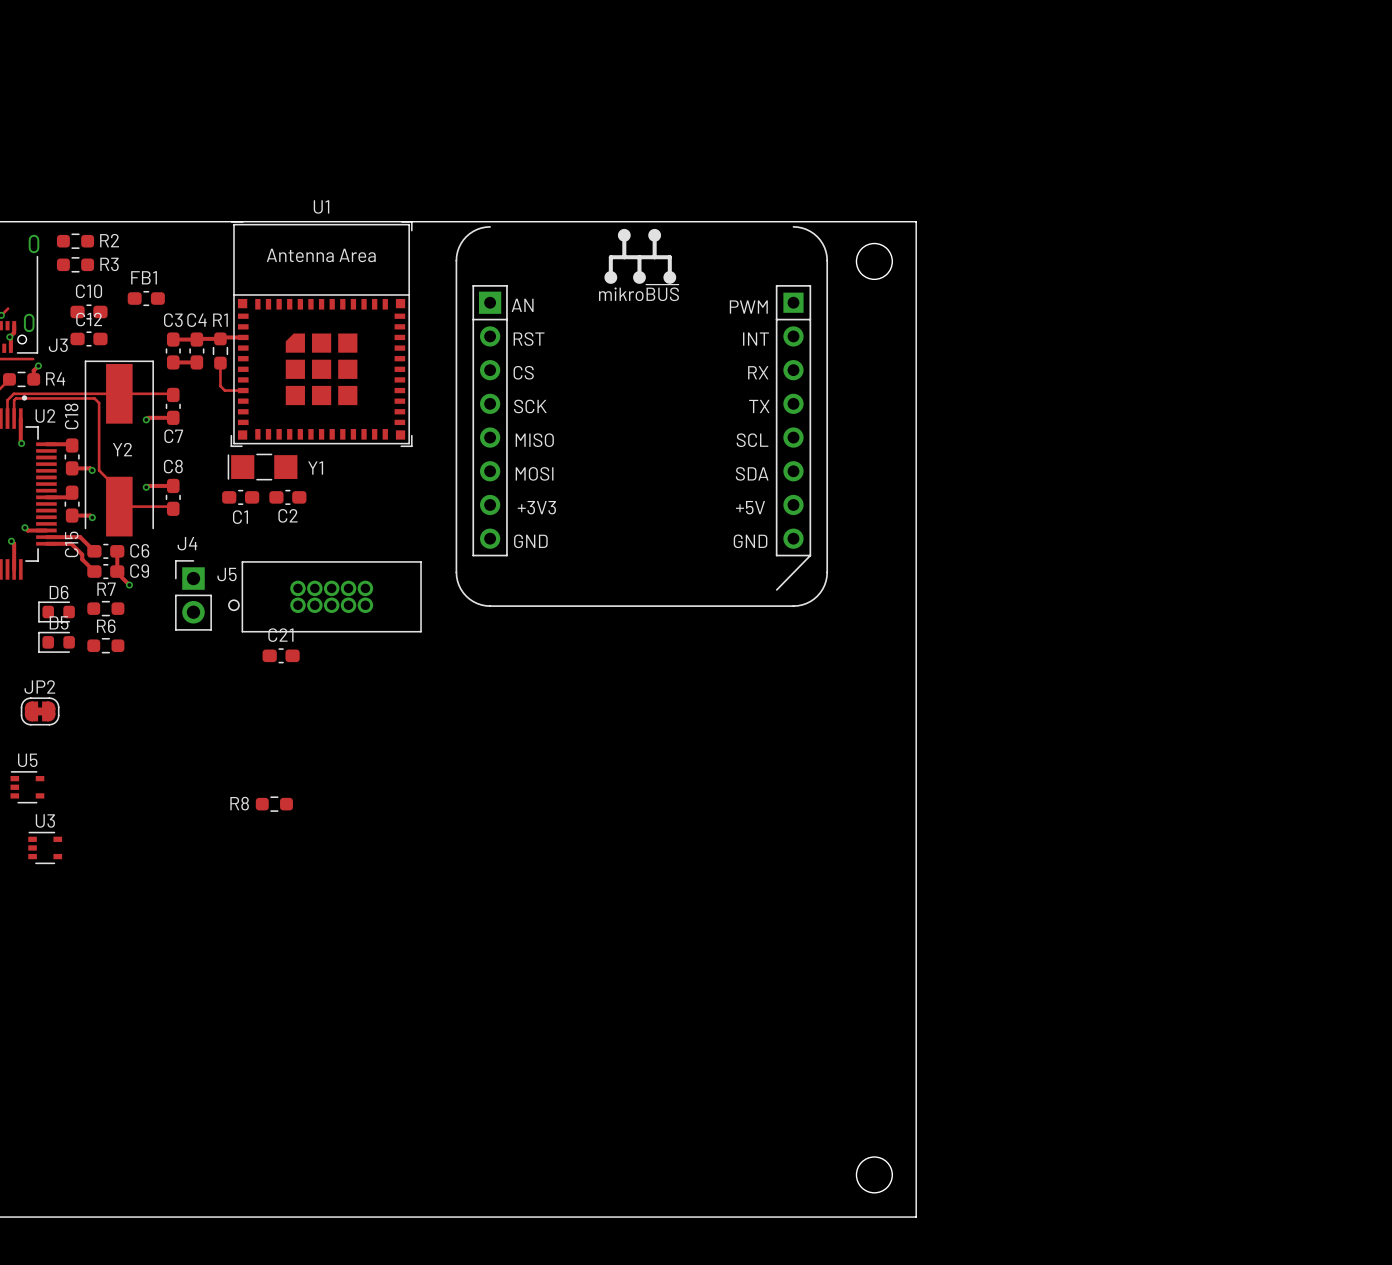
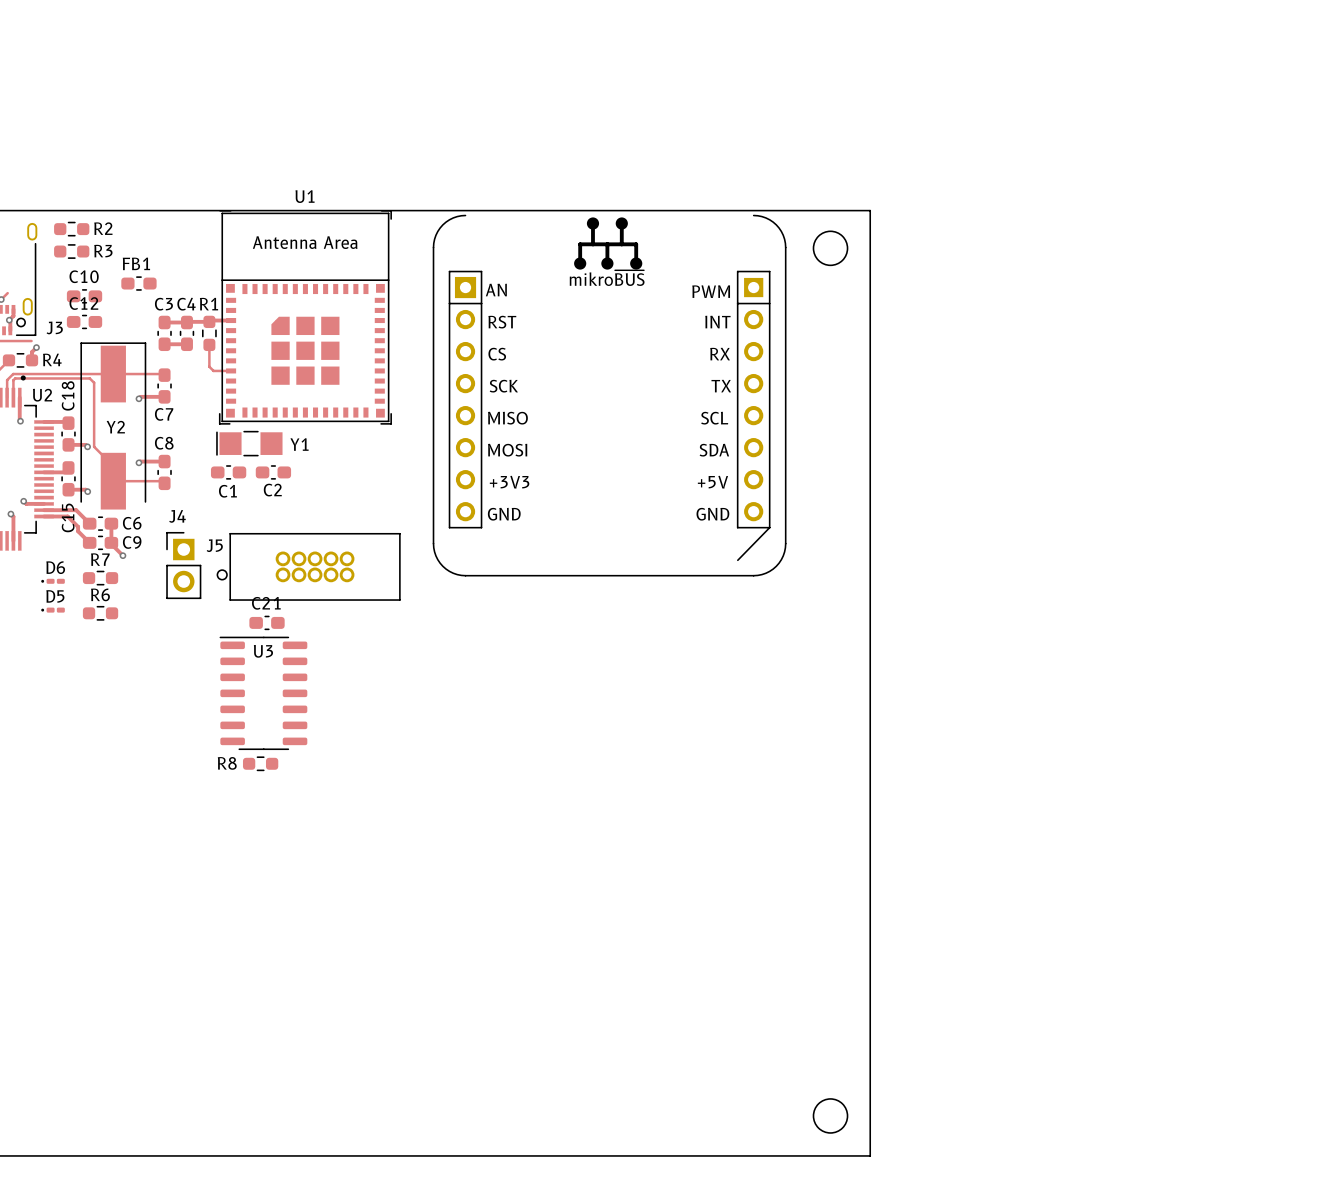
D6 footprint: [38, 601, 75, 623] -> [41, 578, 65, 584]
D5 footprint: [38, 631, 75, 653] -> [41, 607, 65, 613]
JP2: (40, 711) -> none
U5: (27, 787) -> none
U3 footprint: [28, 831, 63, 865] -> [219, 636, 308, 751]

